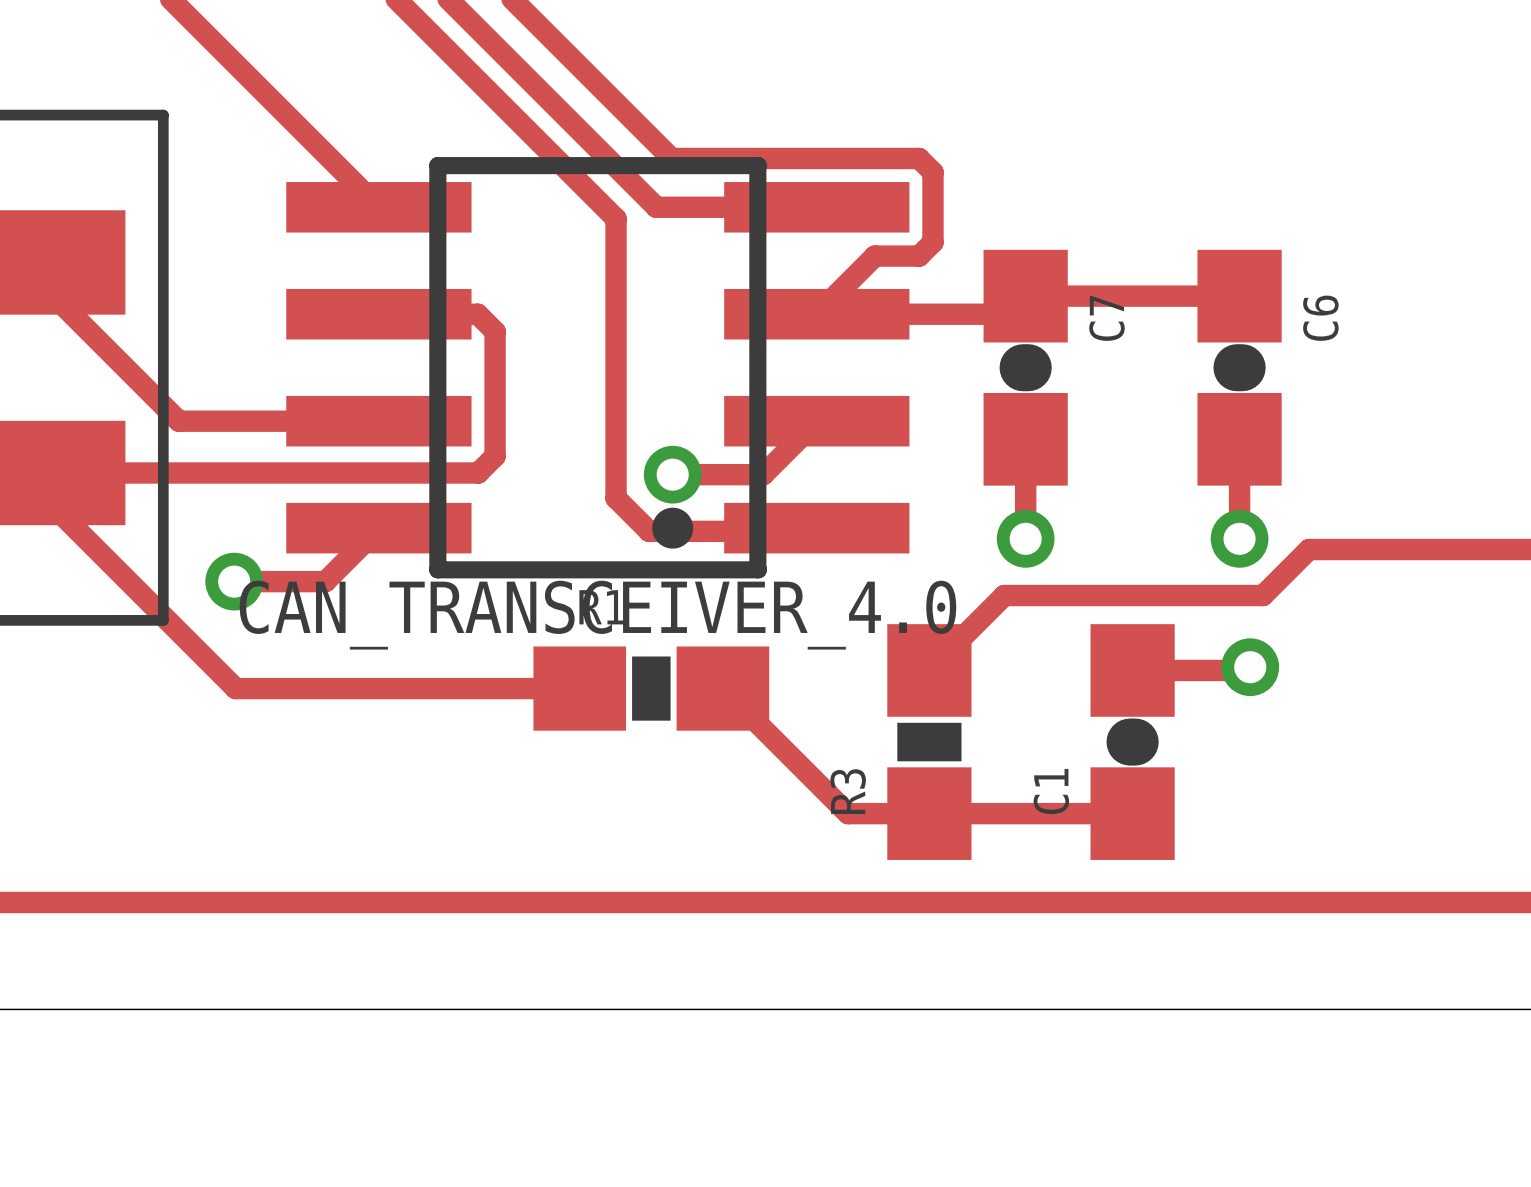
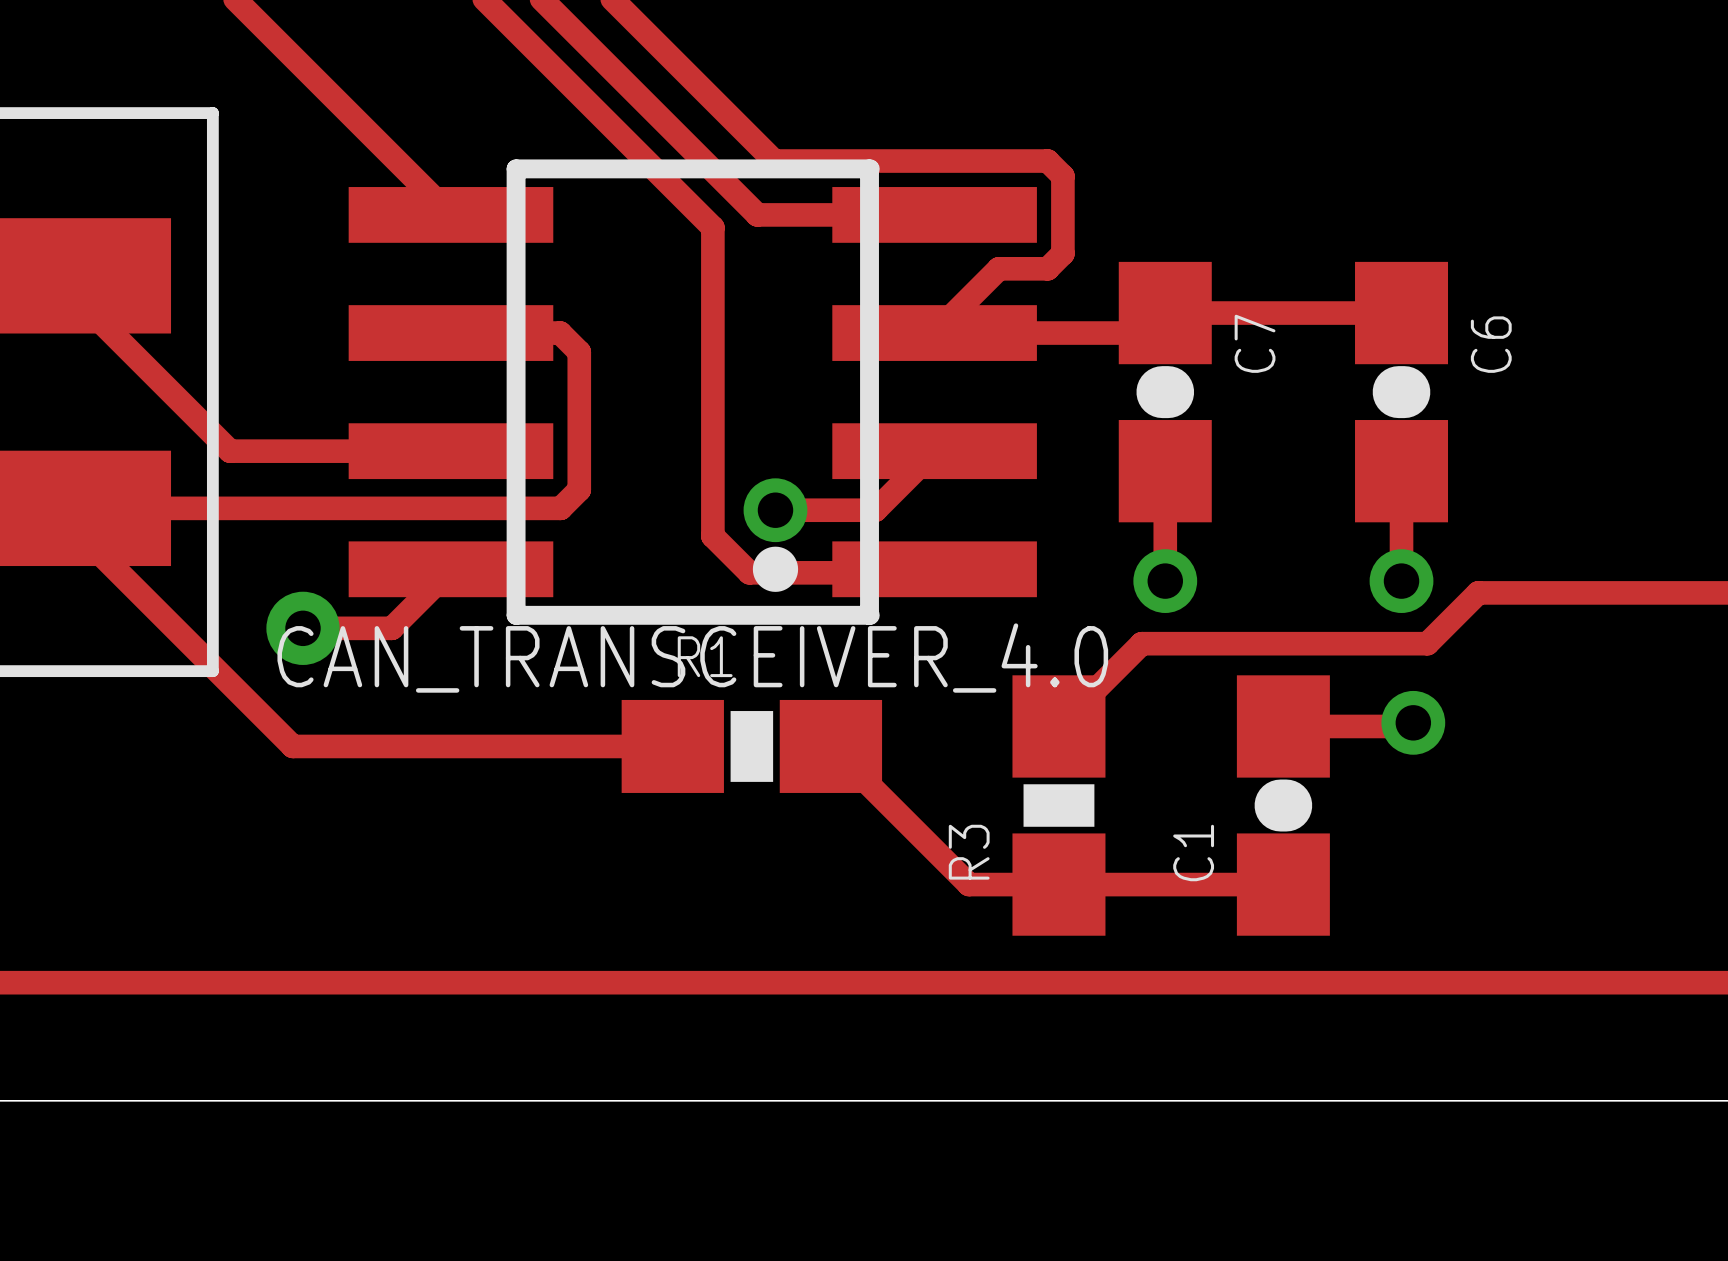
via size: [205, 552, 264, 611] -> [266, 591, 340, 665]

